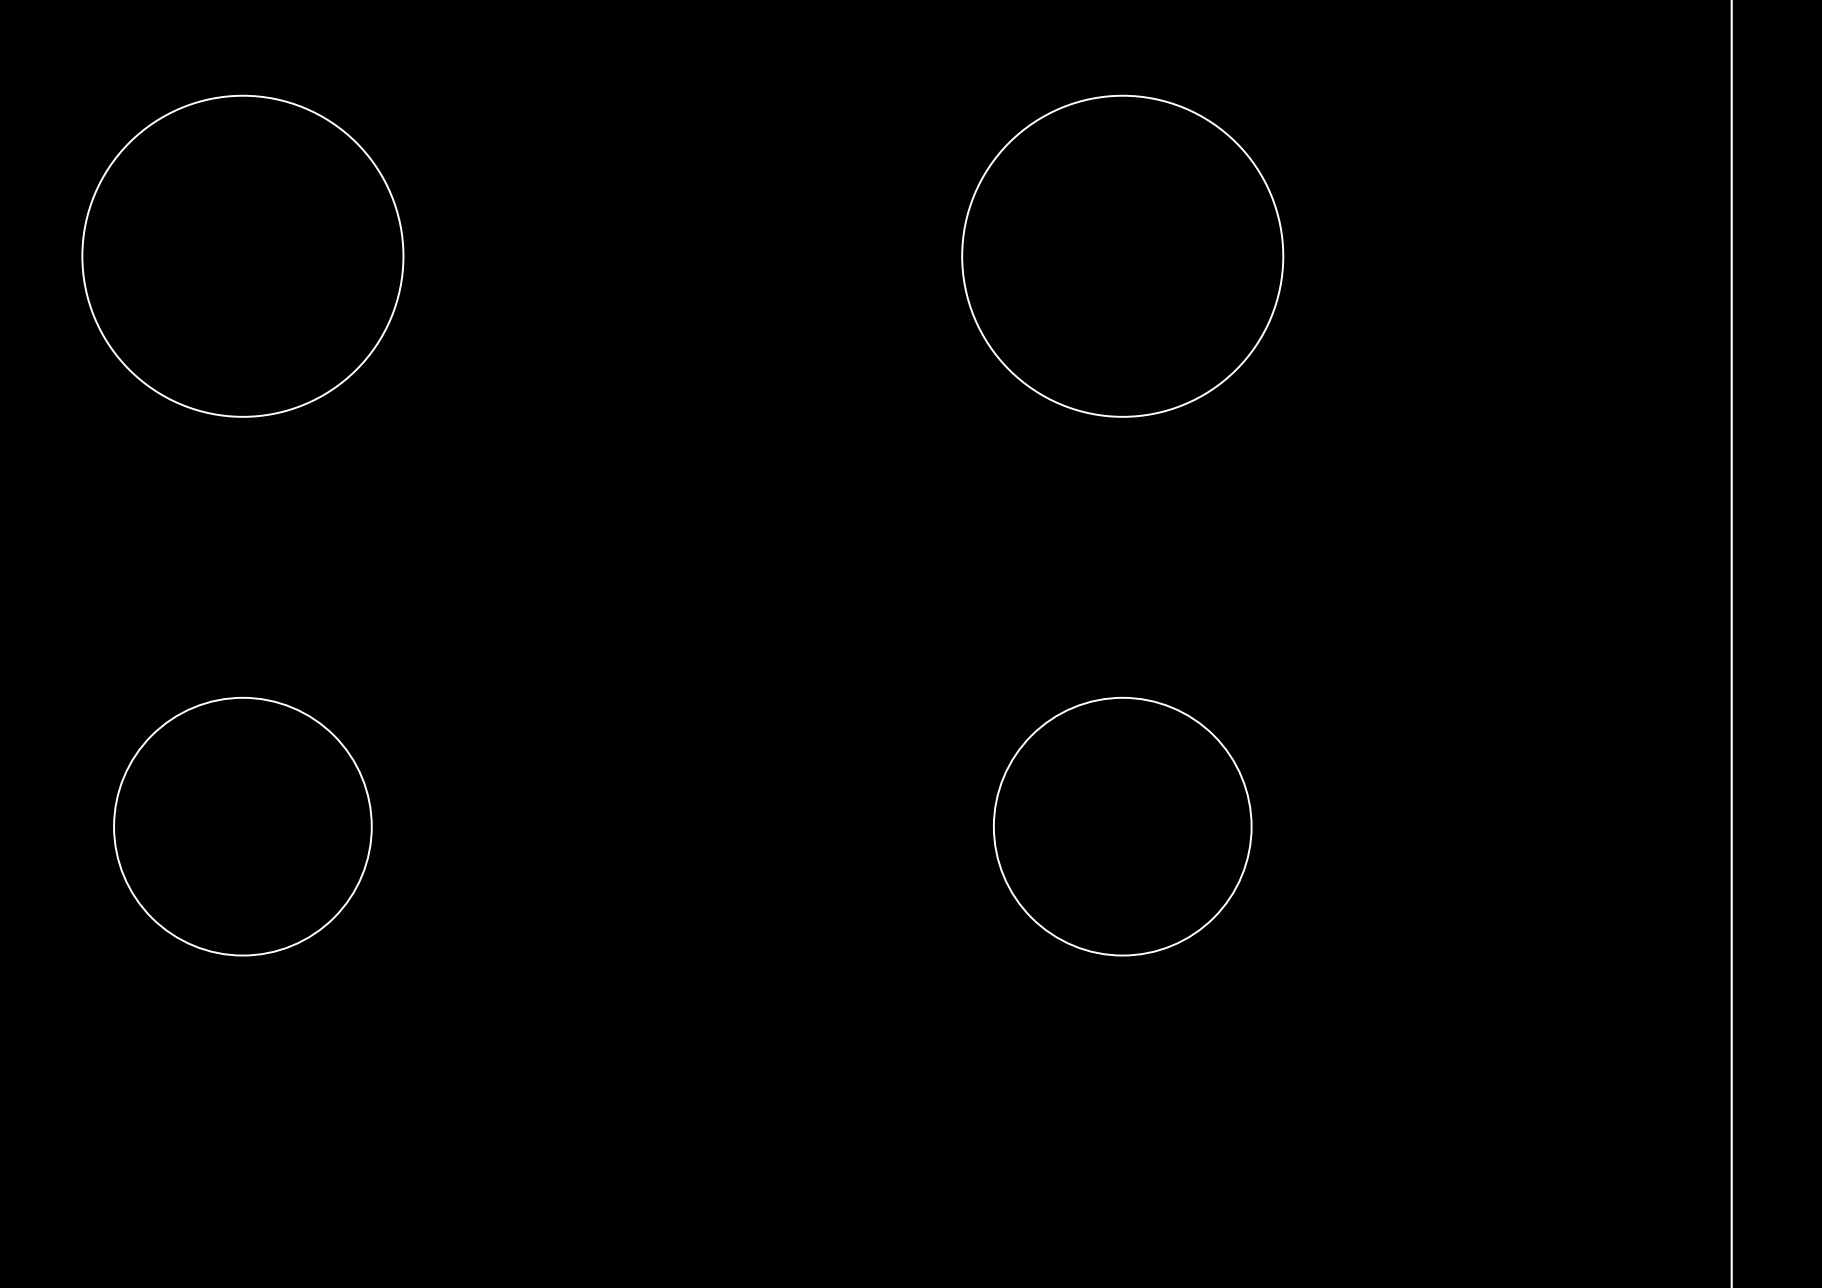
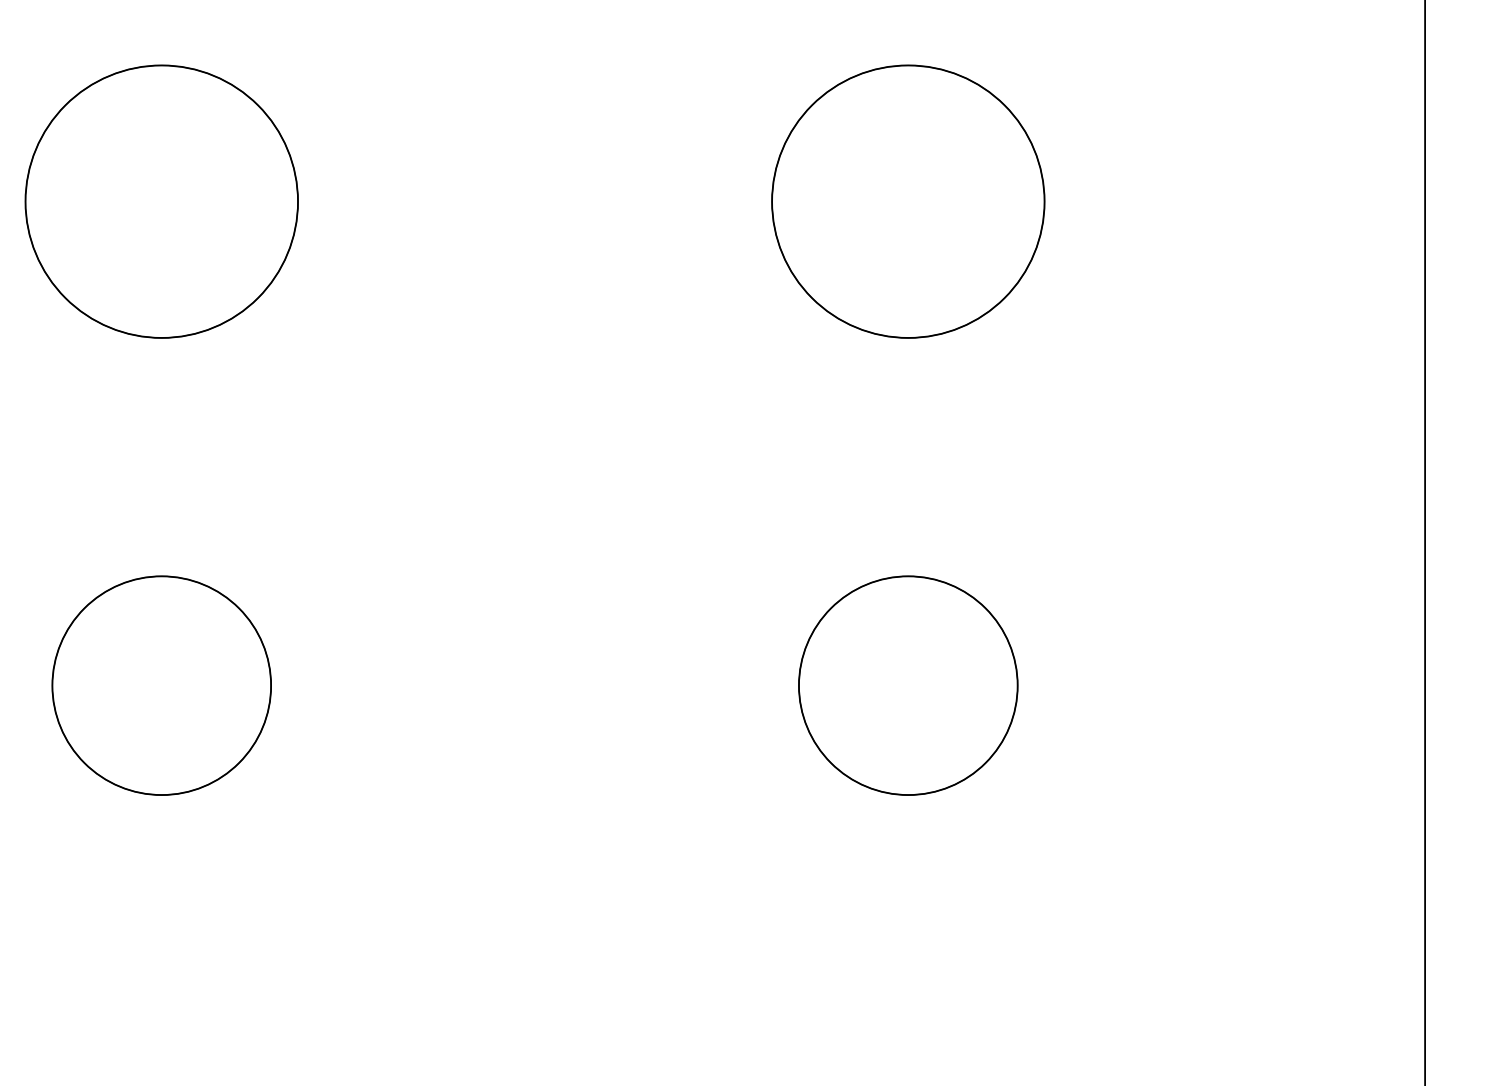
round board edge: none -> [24, 64, 299, 339]
round board edge: none -> [771, 64, 1046, 339]
round board edge: none -> [51, 575, 273, 796]
round board edge: none -> [798, 575, 1019, 796]

